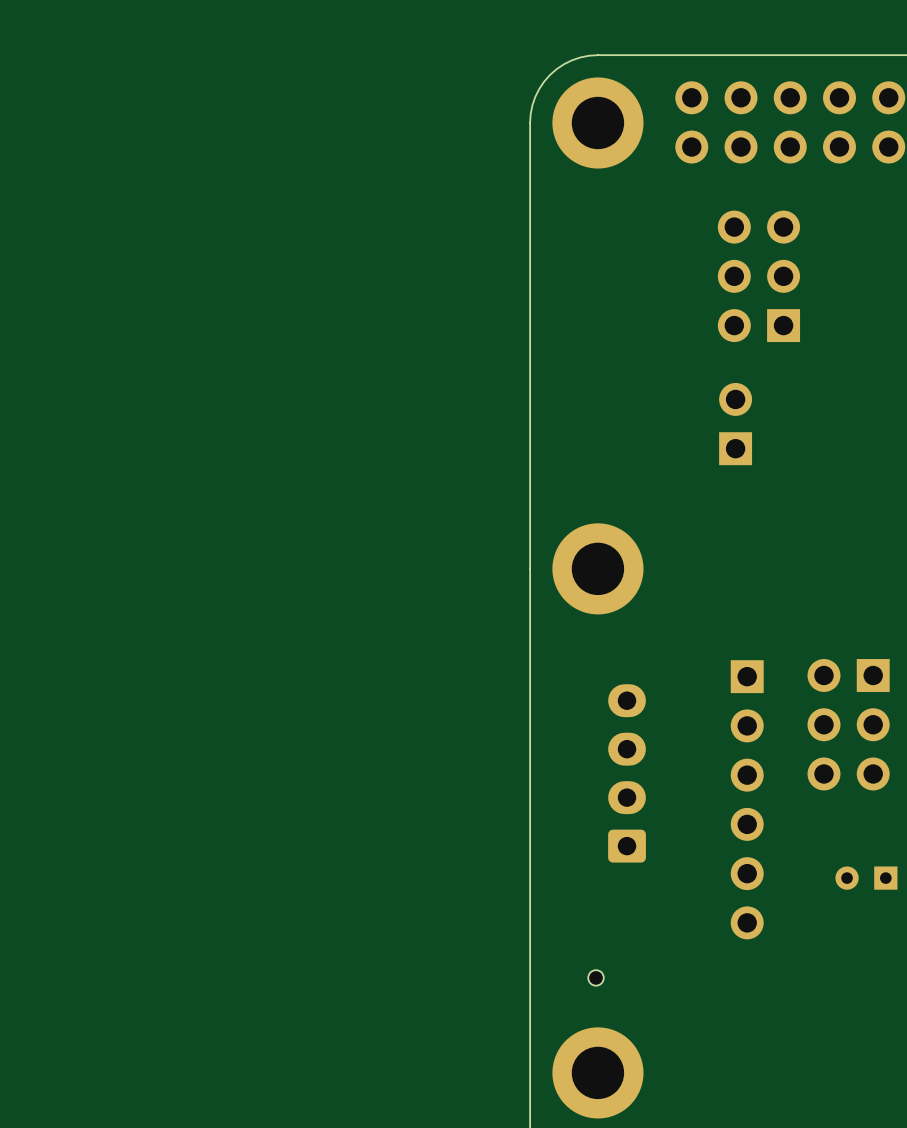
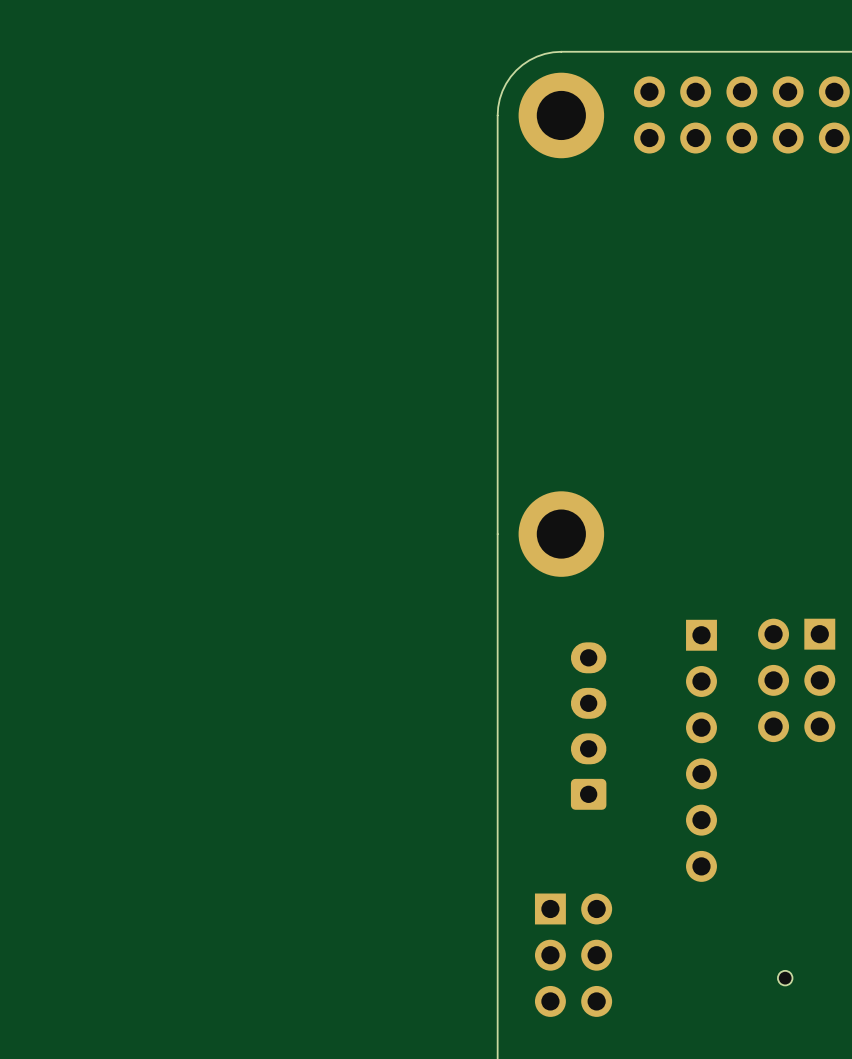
part: (758, 276) -> none
part: (735, 424) -> none
part: (866, 878) -> none
part position: (596, 977) -> (785, 978)
part: none -> (573, 955)
part: (597, 1072) -> none

